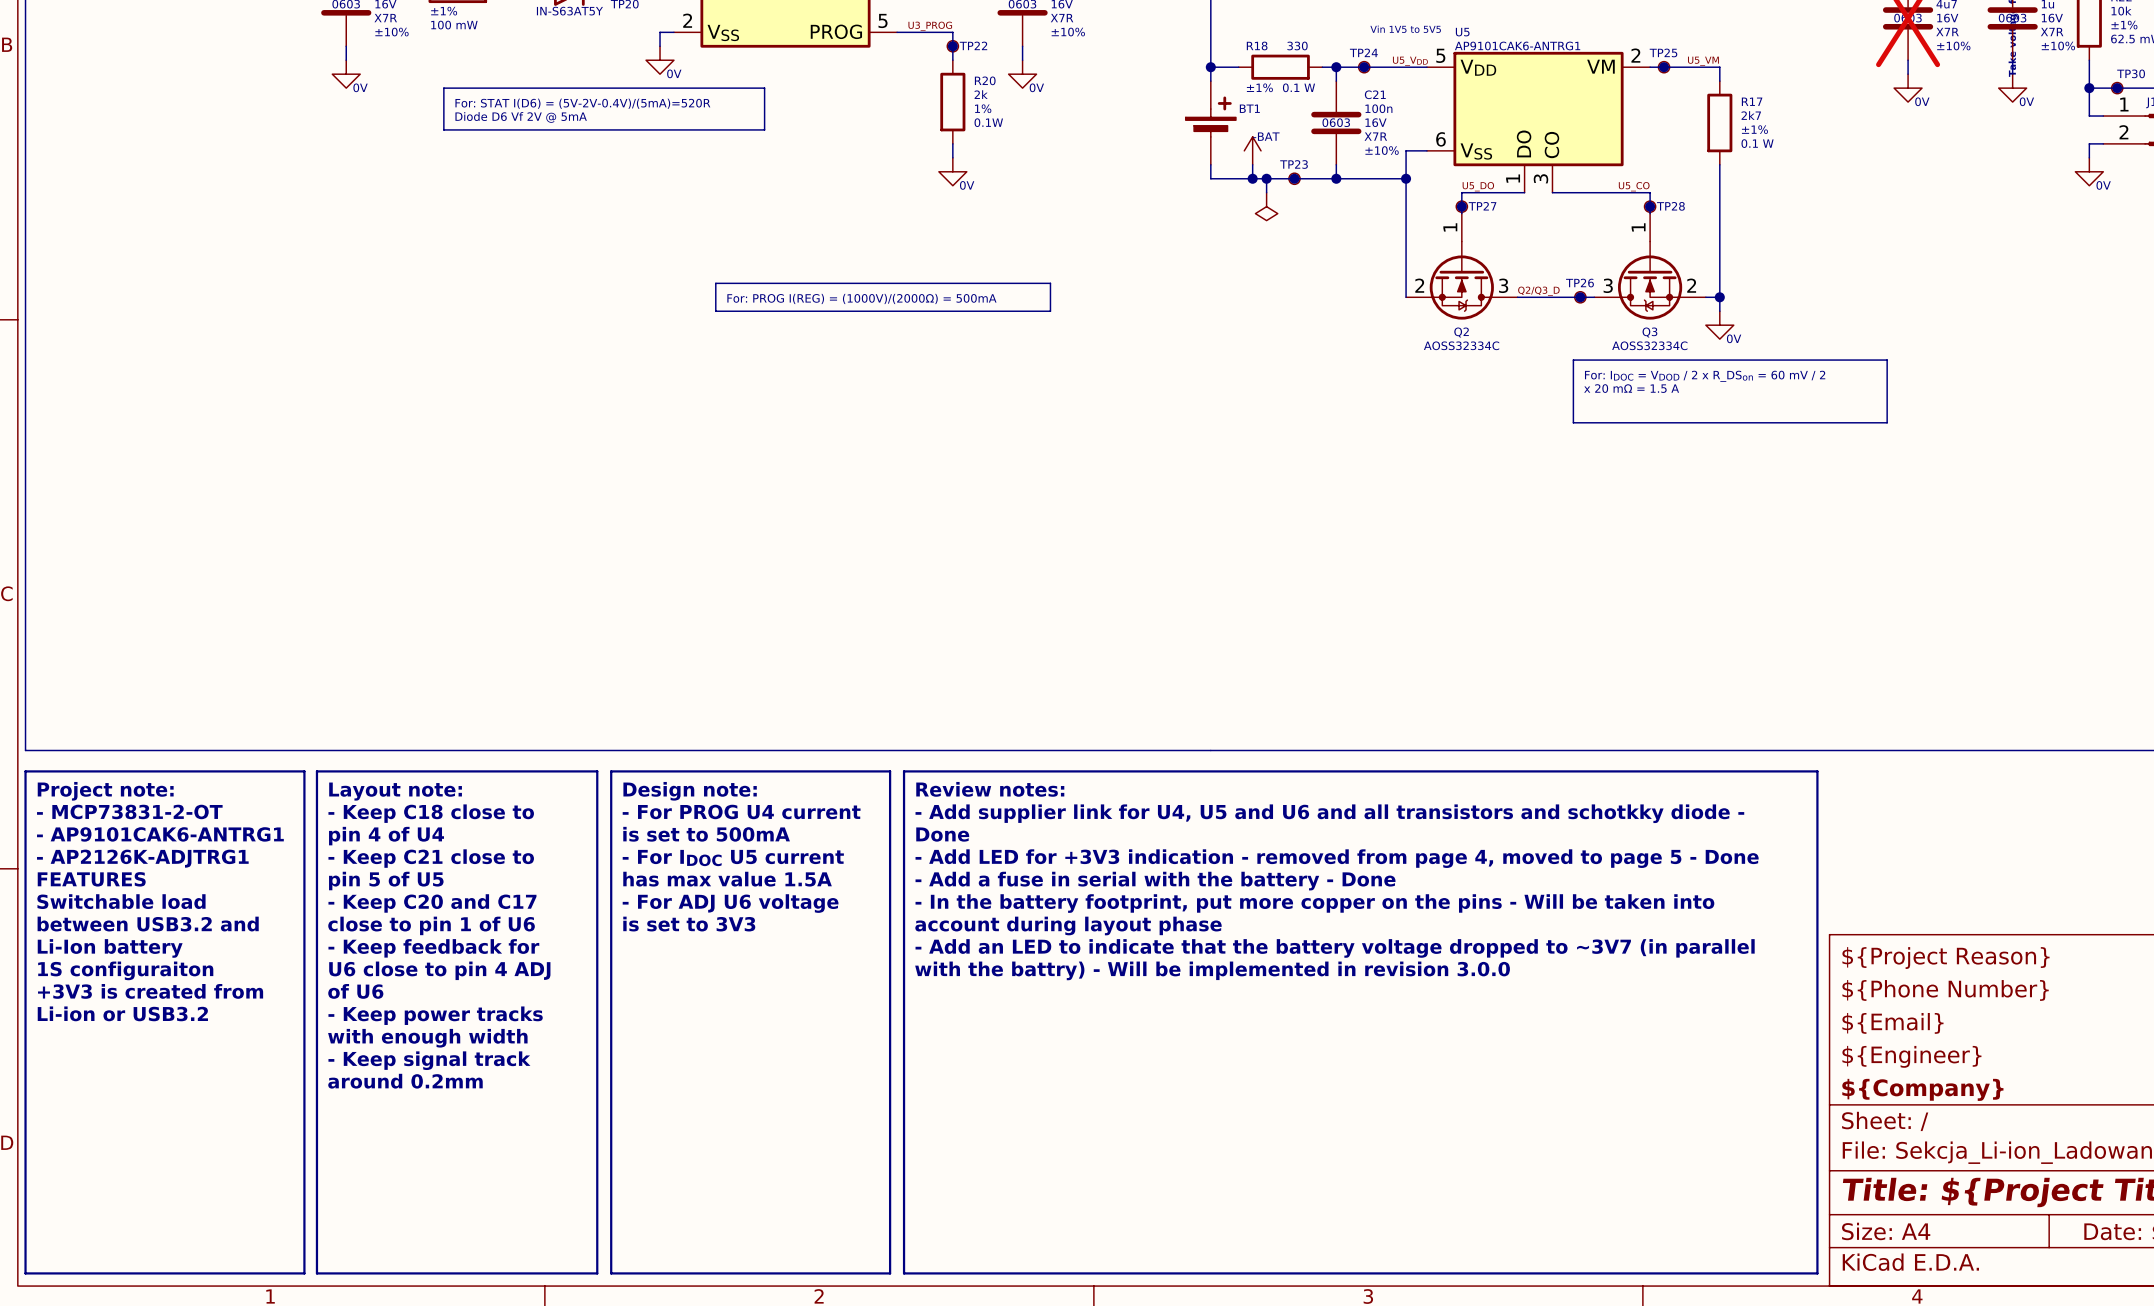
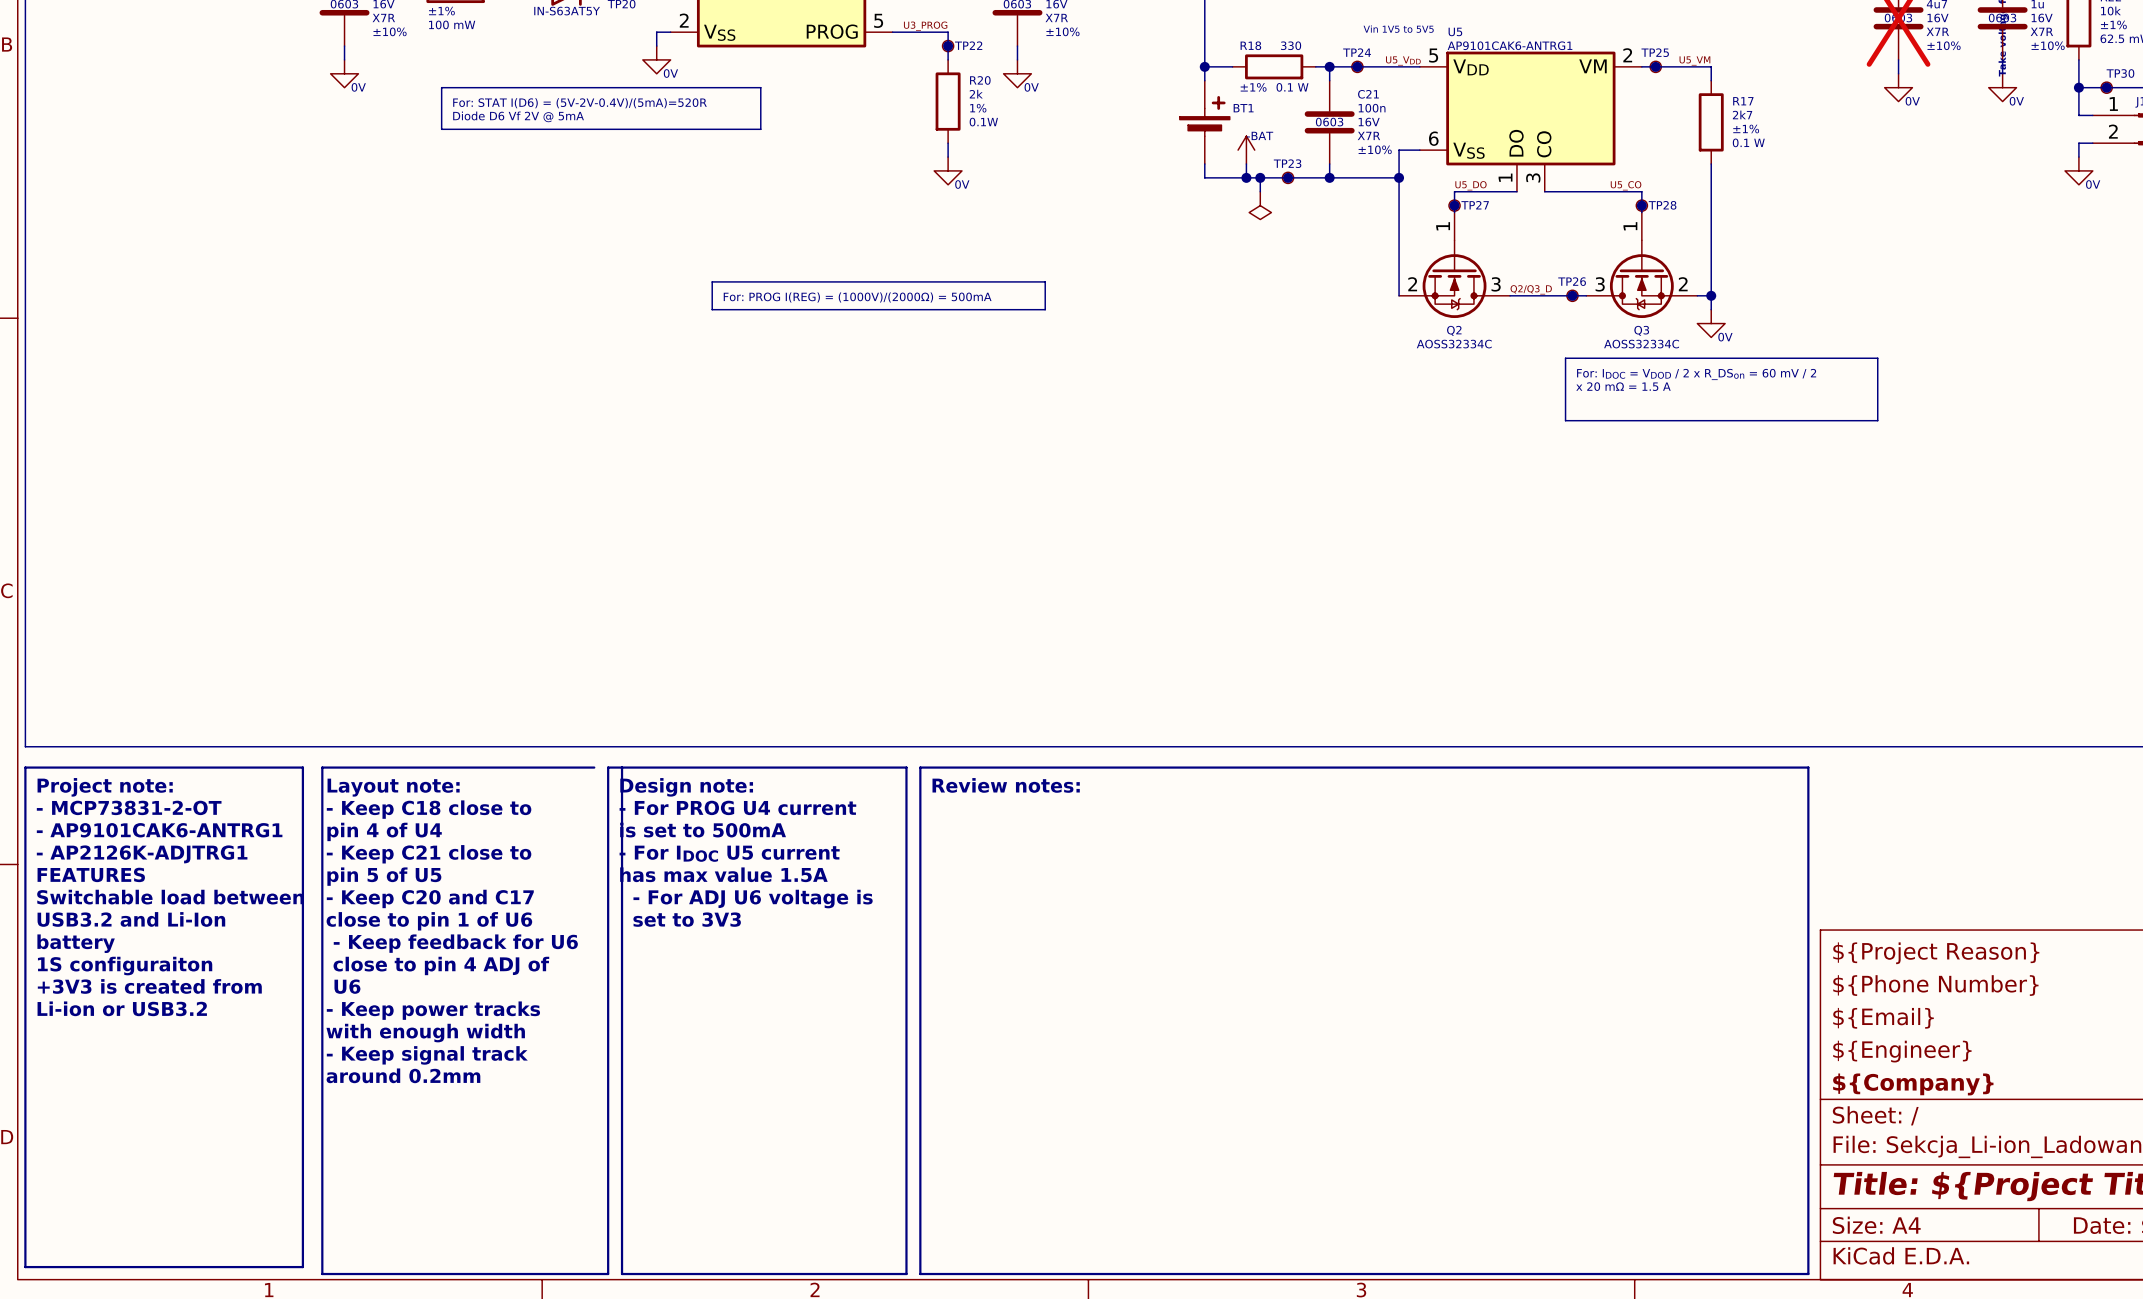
line: (323, 771) (316, 771) (316, 1273) (597, 1273) (597, 771) -> (322, 767) (322, 1274) (608, 1274) (608, 1267)
line: (890, 771) (890, 1273) (611, 1273) -> (885, 767) (899, 767)
line: (904, 771) (904, 1273) (1817, 1273) -> (920, 767) (920, 1274) (1808, 1274) (1808, 1267)
line: (911, 771) (924, 771) -> (906, 767) (906, 1274) (622, 1274) (622, 767)
text position: Review notes: (990, 789) -> Review notes: (1006, 785)
text: - Add supplier link for U4, U5 and U6 and all transistors and schotkky diode - (1329, 813) -> none
text: Done (942, 834) -> none
text: - Add LED for +3V3 indication - removed from page 4, moved to page 5 - Done (1337, 858) -> none
text: - Add a fuse in serial with the battery - Done (1155, 881) -> none
text: Switchable load (121, 901) -> Switchable load between (170, 897)
text: - For ADJ U6 voltage (730, 903) -> - For ADJ U6 voltage is (753, 899)
text: - In the battery footprint, put more copper on the pins - Will be taken into (1314, 903) -> none
text: between USB3.2 and (148, 924) -> USB3.2 and Li-Ion (131, 919)
text: is set to 3V3 (689, 924) -> set to 3V3 (687, 919)
text: account during layout phase (1068, 925) -> none
text: Li-Ion battery (110, 948) -> battery (76, 943)
text: - Keep feedback for (433, 948) -> - Keep feedback for U6 (455, 943)
text: - Add an LED to indicate that the battery voltage dropped to ~3V7 (in parallel (1335, 948) -> none
text: U6 close to pin 4 ADJ (439, 970) -> close to pin 4 ADJ of (441, 965)
text: with the battry) - Will be implemented in revision 3.0.0 (1212, 970) -> none
text: of U6 (355, 991) -> U6 (347, 986)

